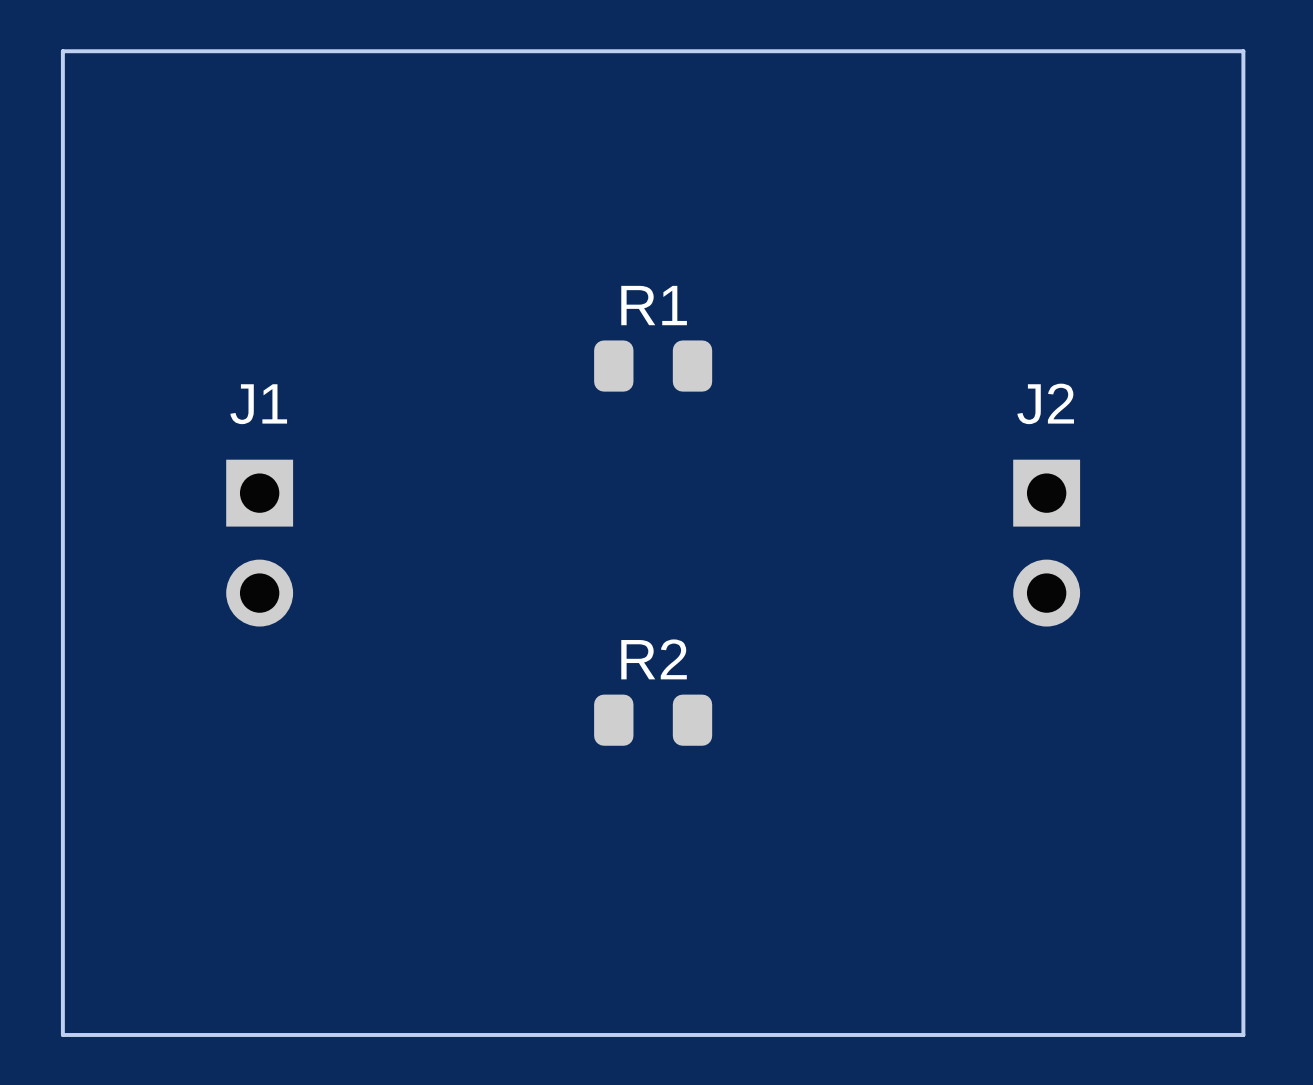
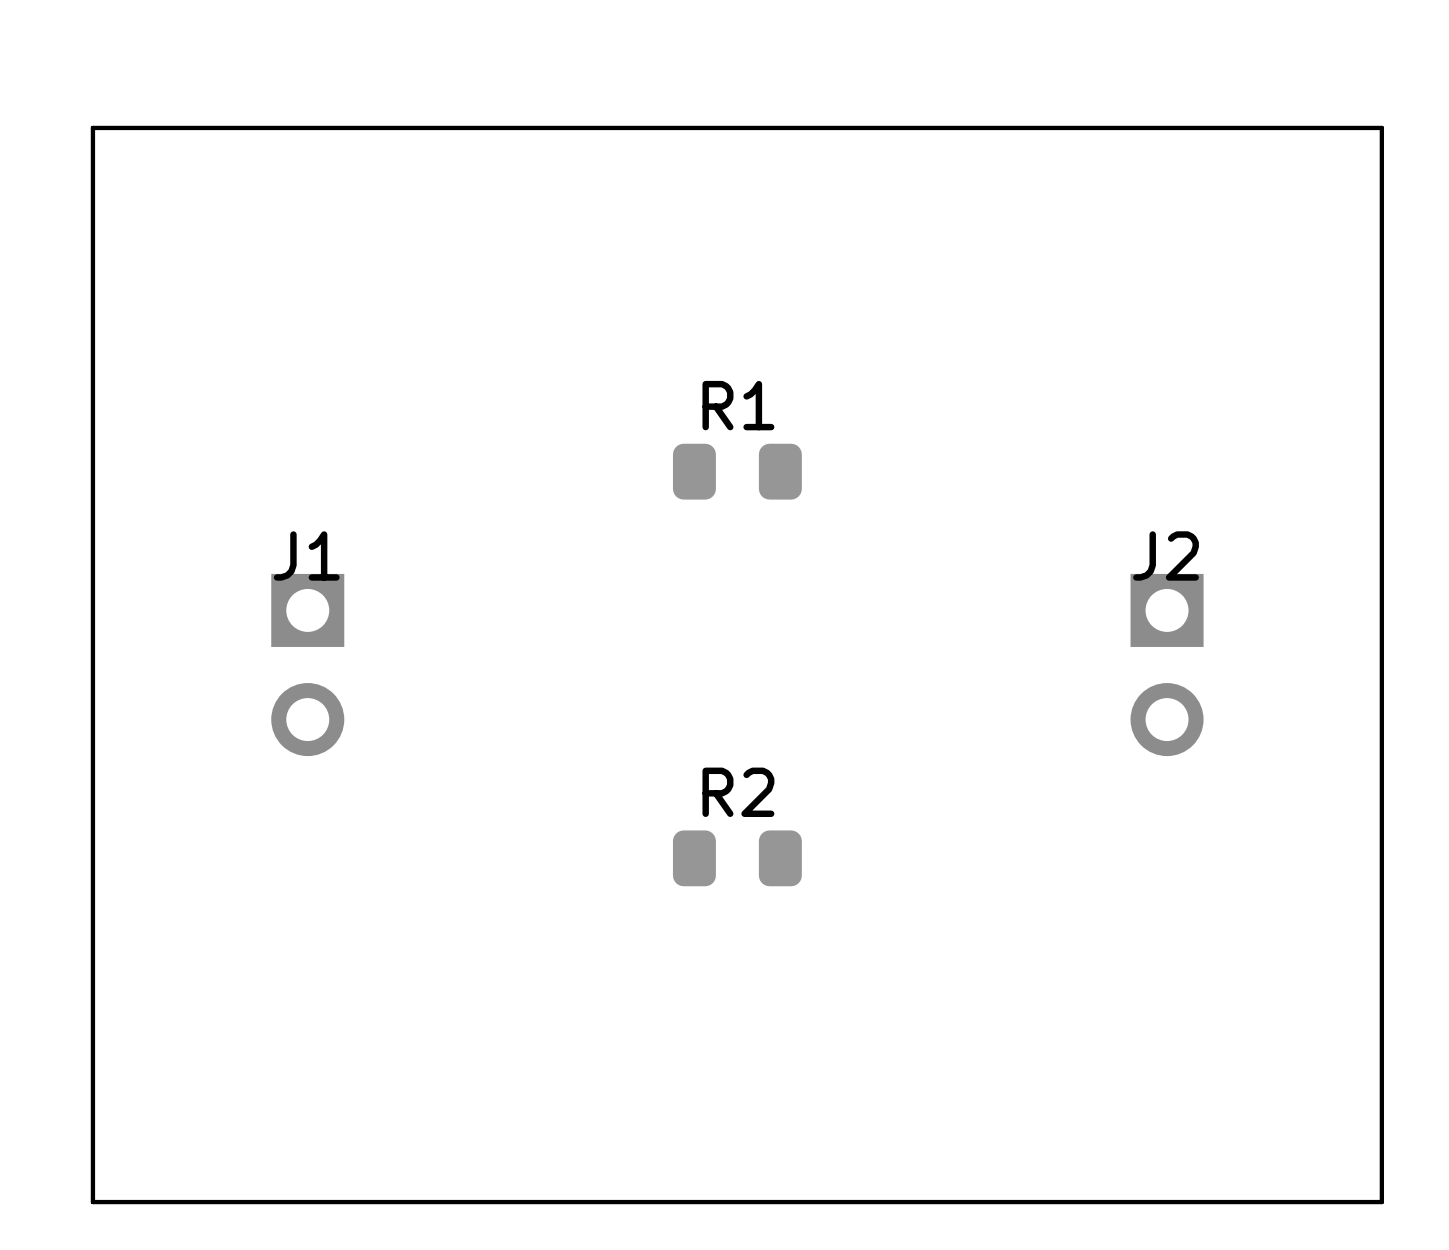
J2 name position: J2 (1045, 403) -> J2 (1166, 555)
J1 name position: J1 (258, 404) -> J1 (306, 555)

